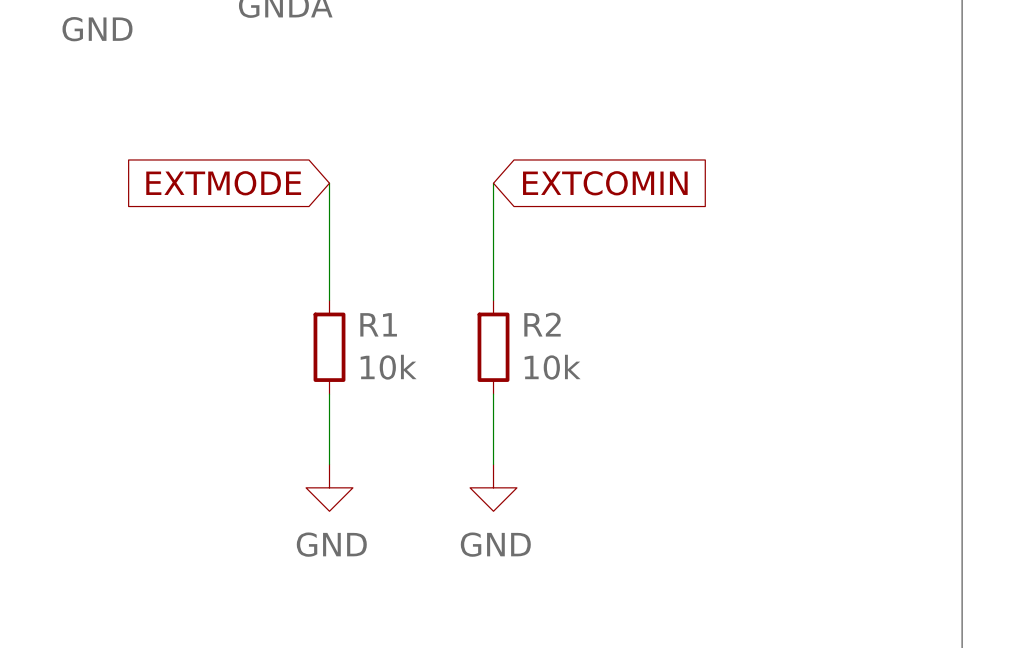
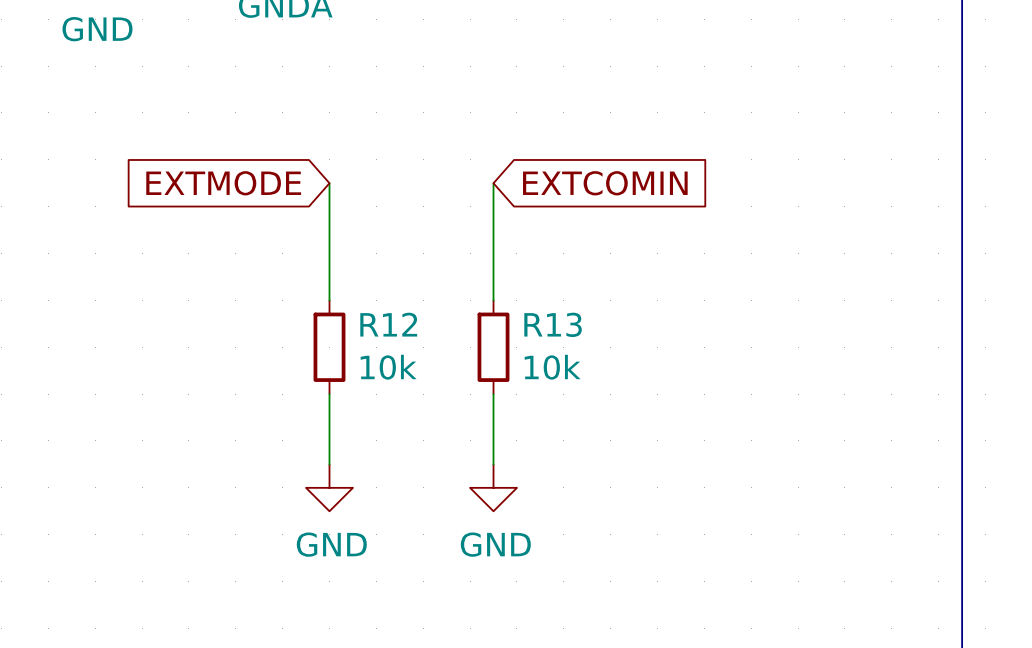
R1 name: R1 (378, 324) -> R12 (388, 324)
R2 name: R2 (542, 324) -> R13 (553, 324)

